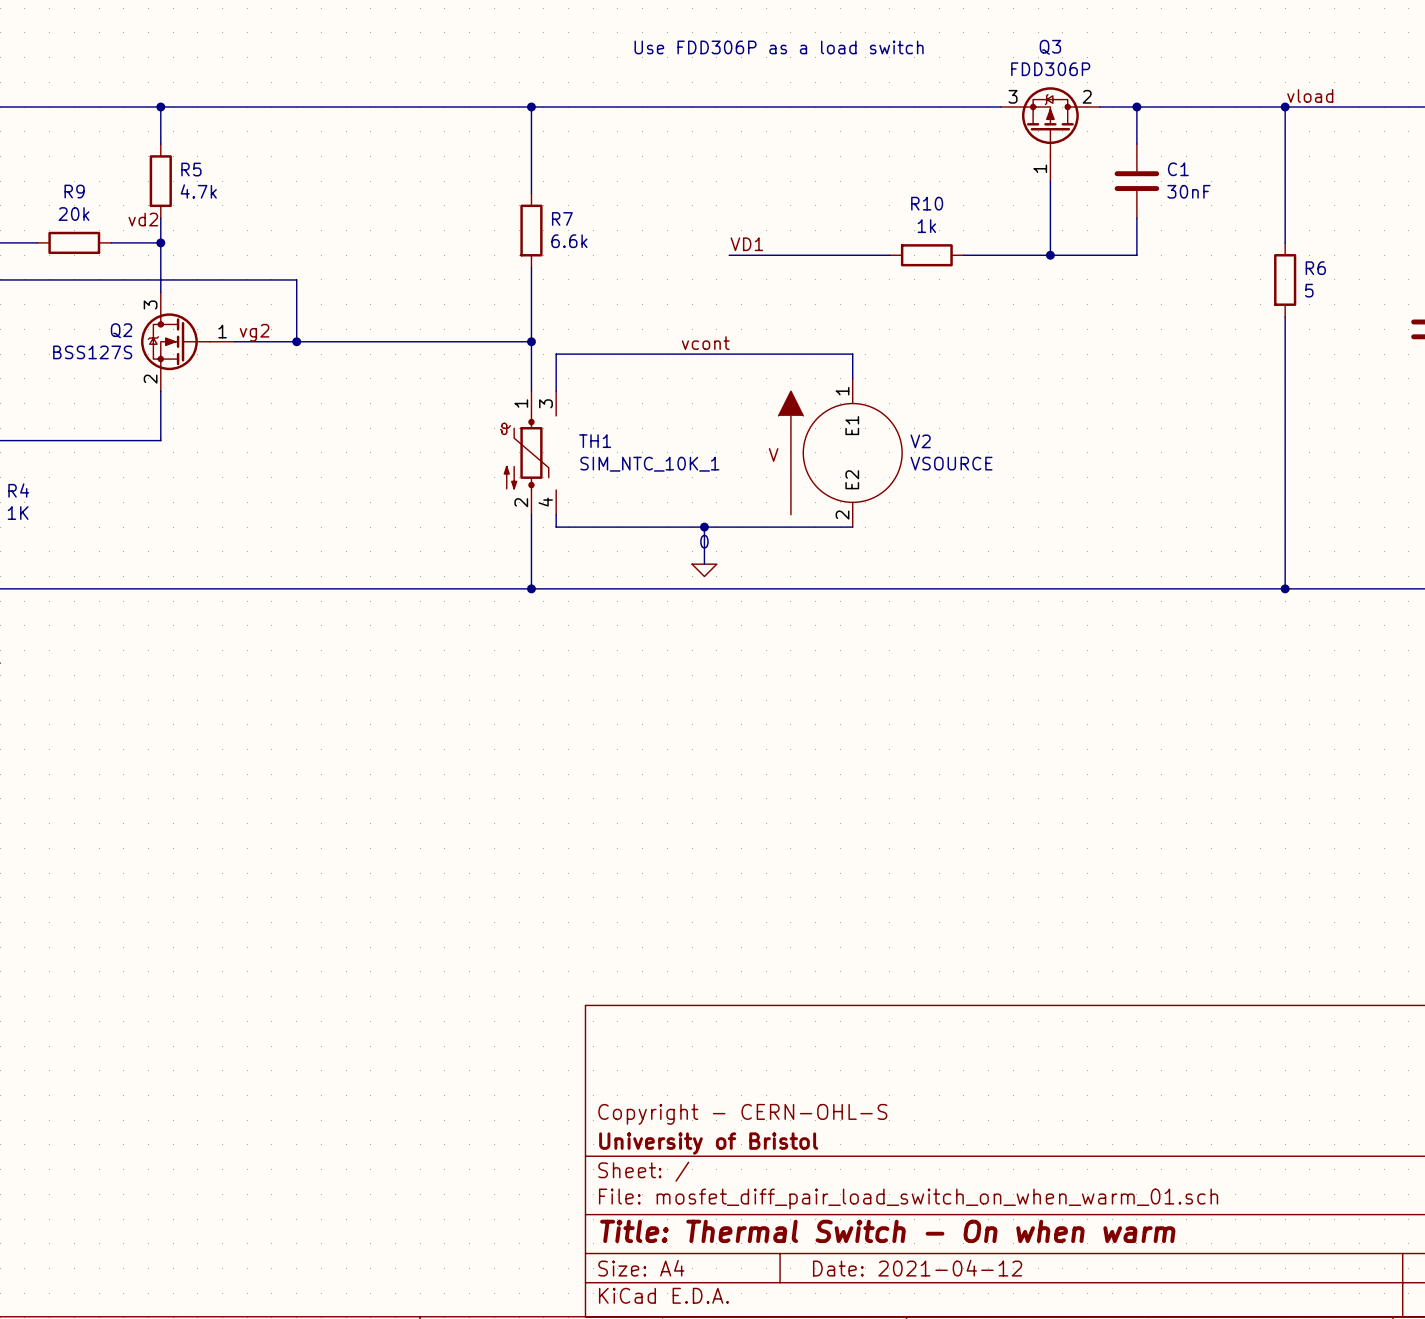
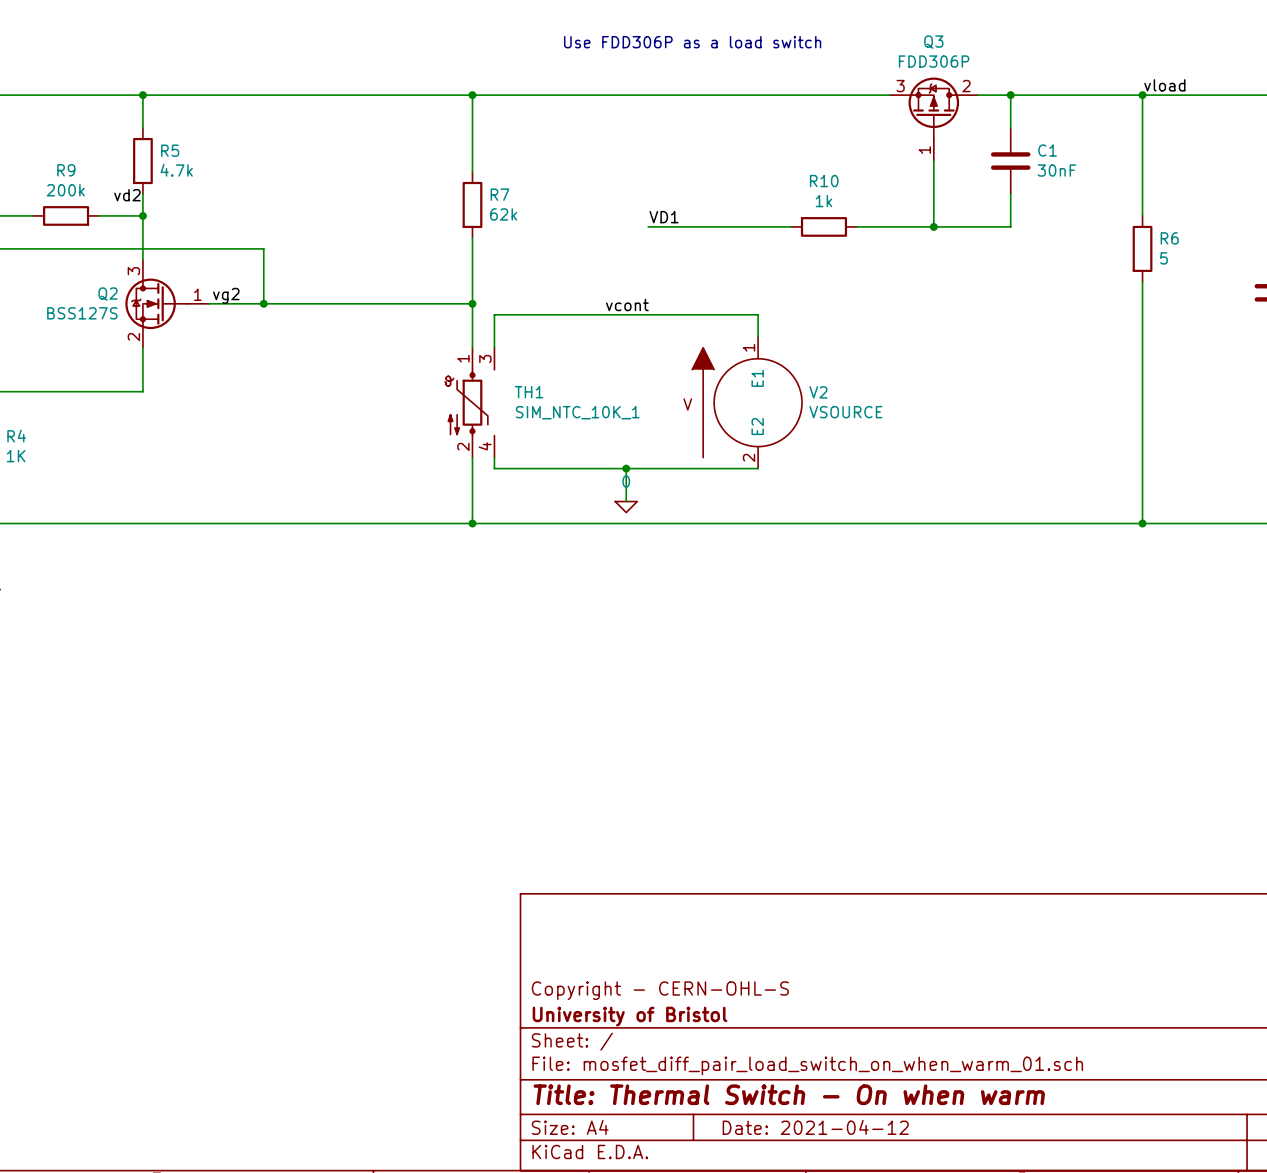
R9 value: 20k (74, 214) -> 200k (65, 190)
R7 value: 6.6k (569, 241) -> 62k (503, 214)

